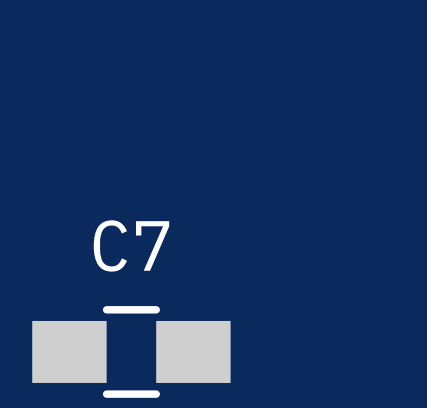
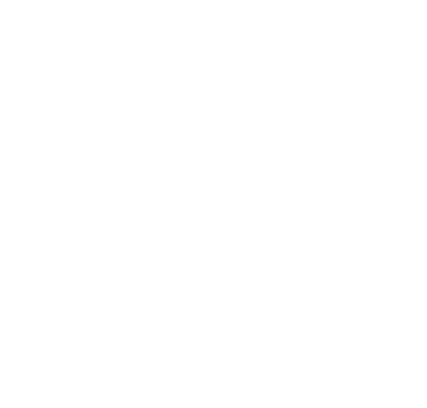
C7: (131, 351) -> none

